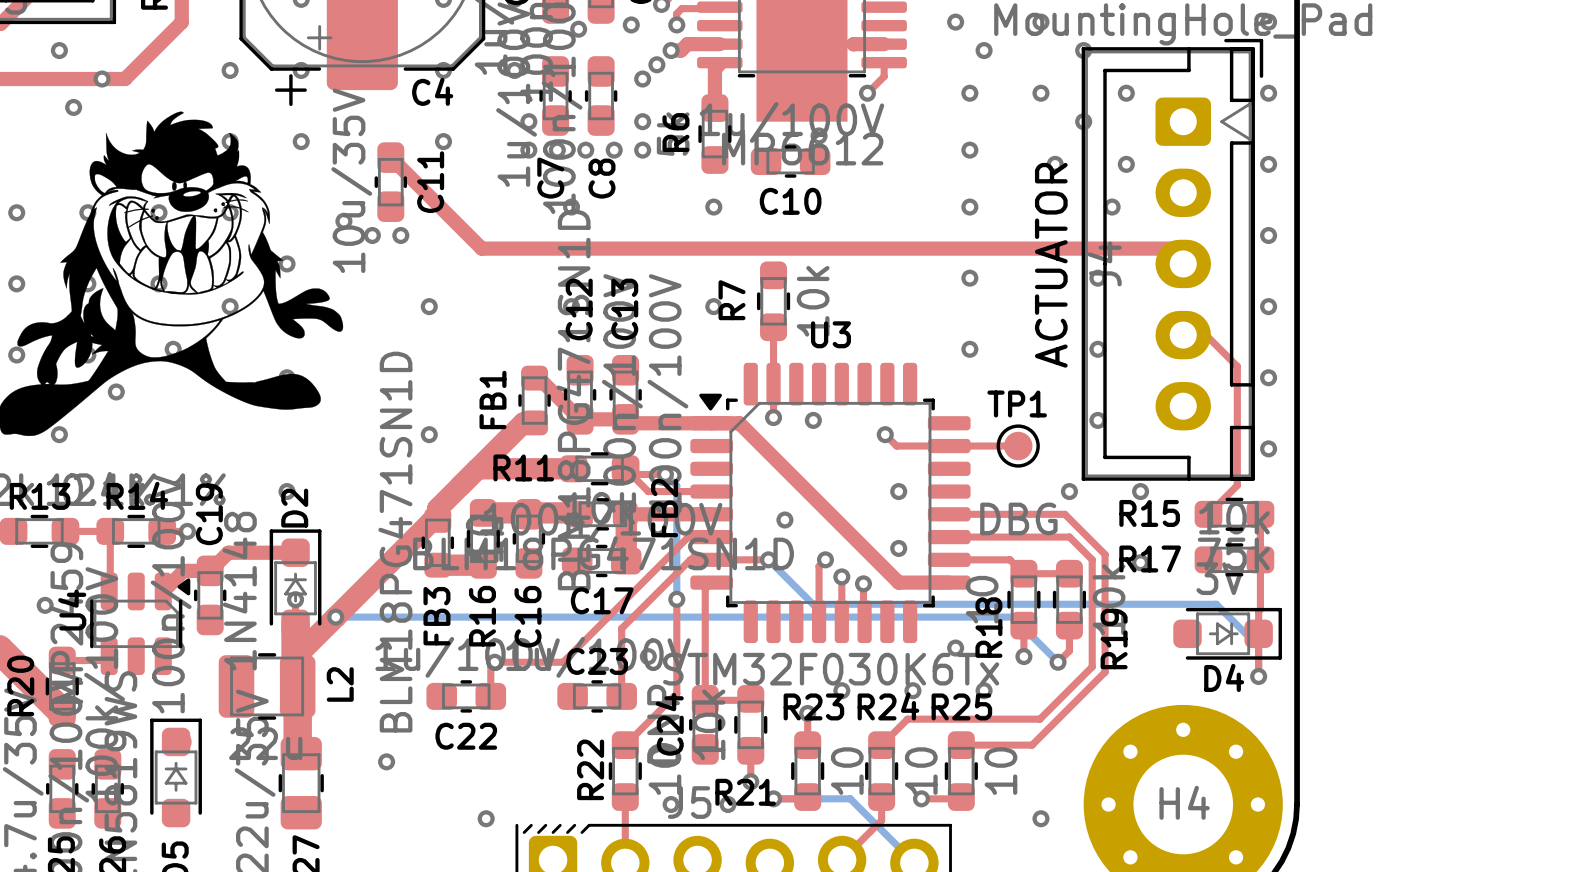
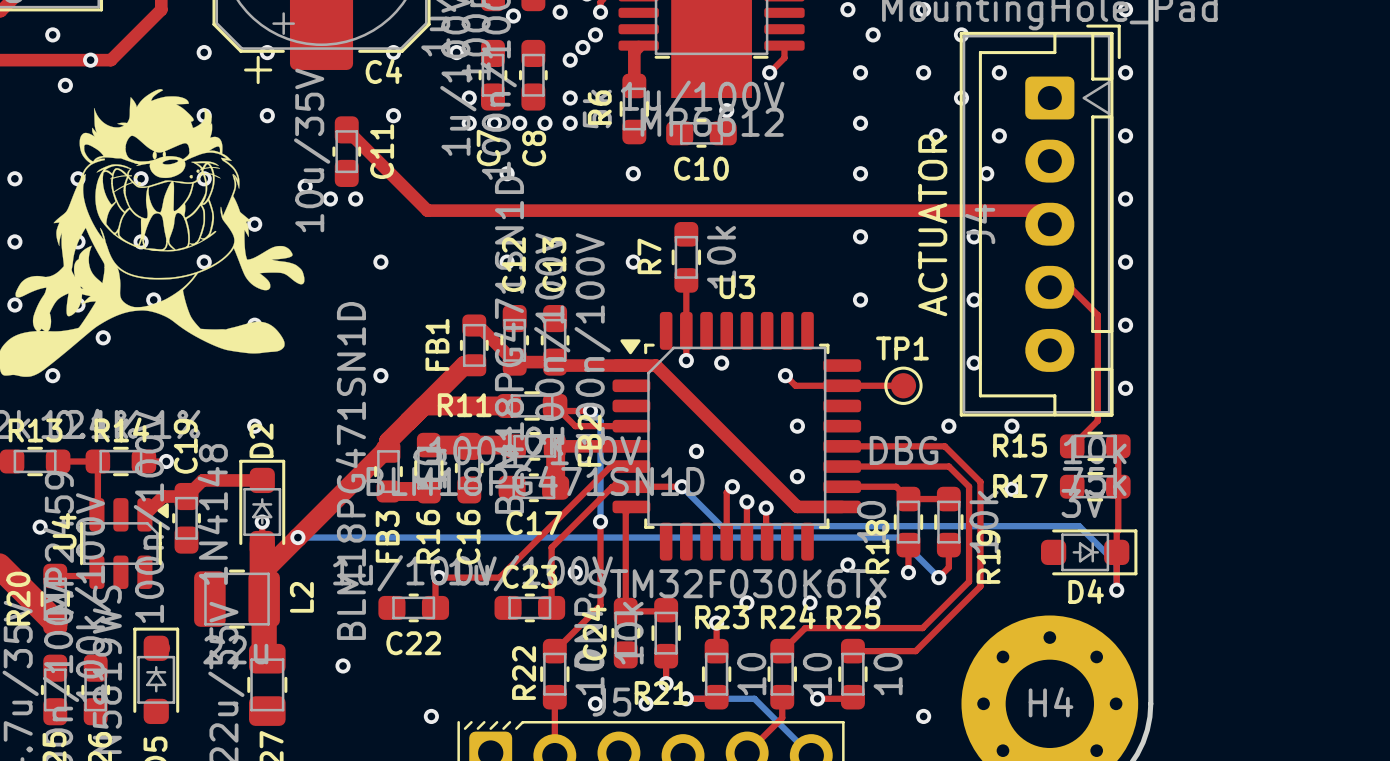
top track: (719, 44) (687, 44) (681, 50) (671, 50) -> none
top track: (853, 44) (884, 44) -> none

